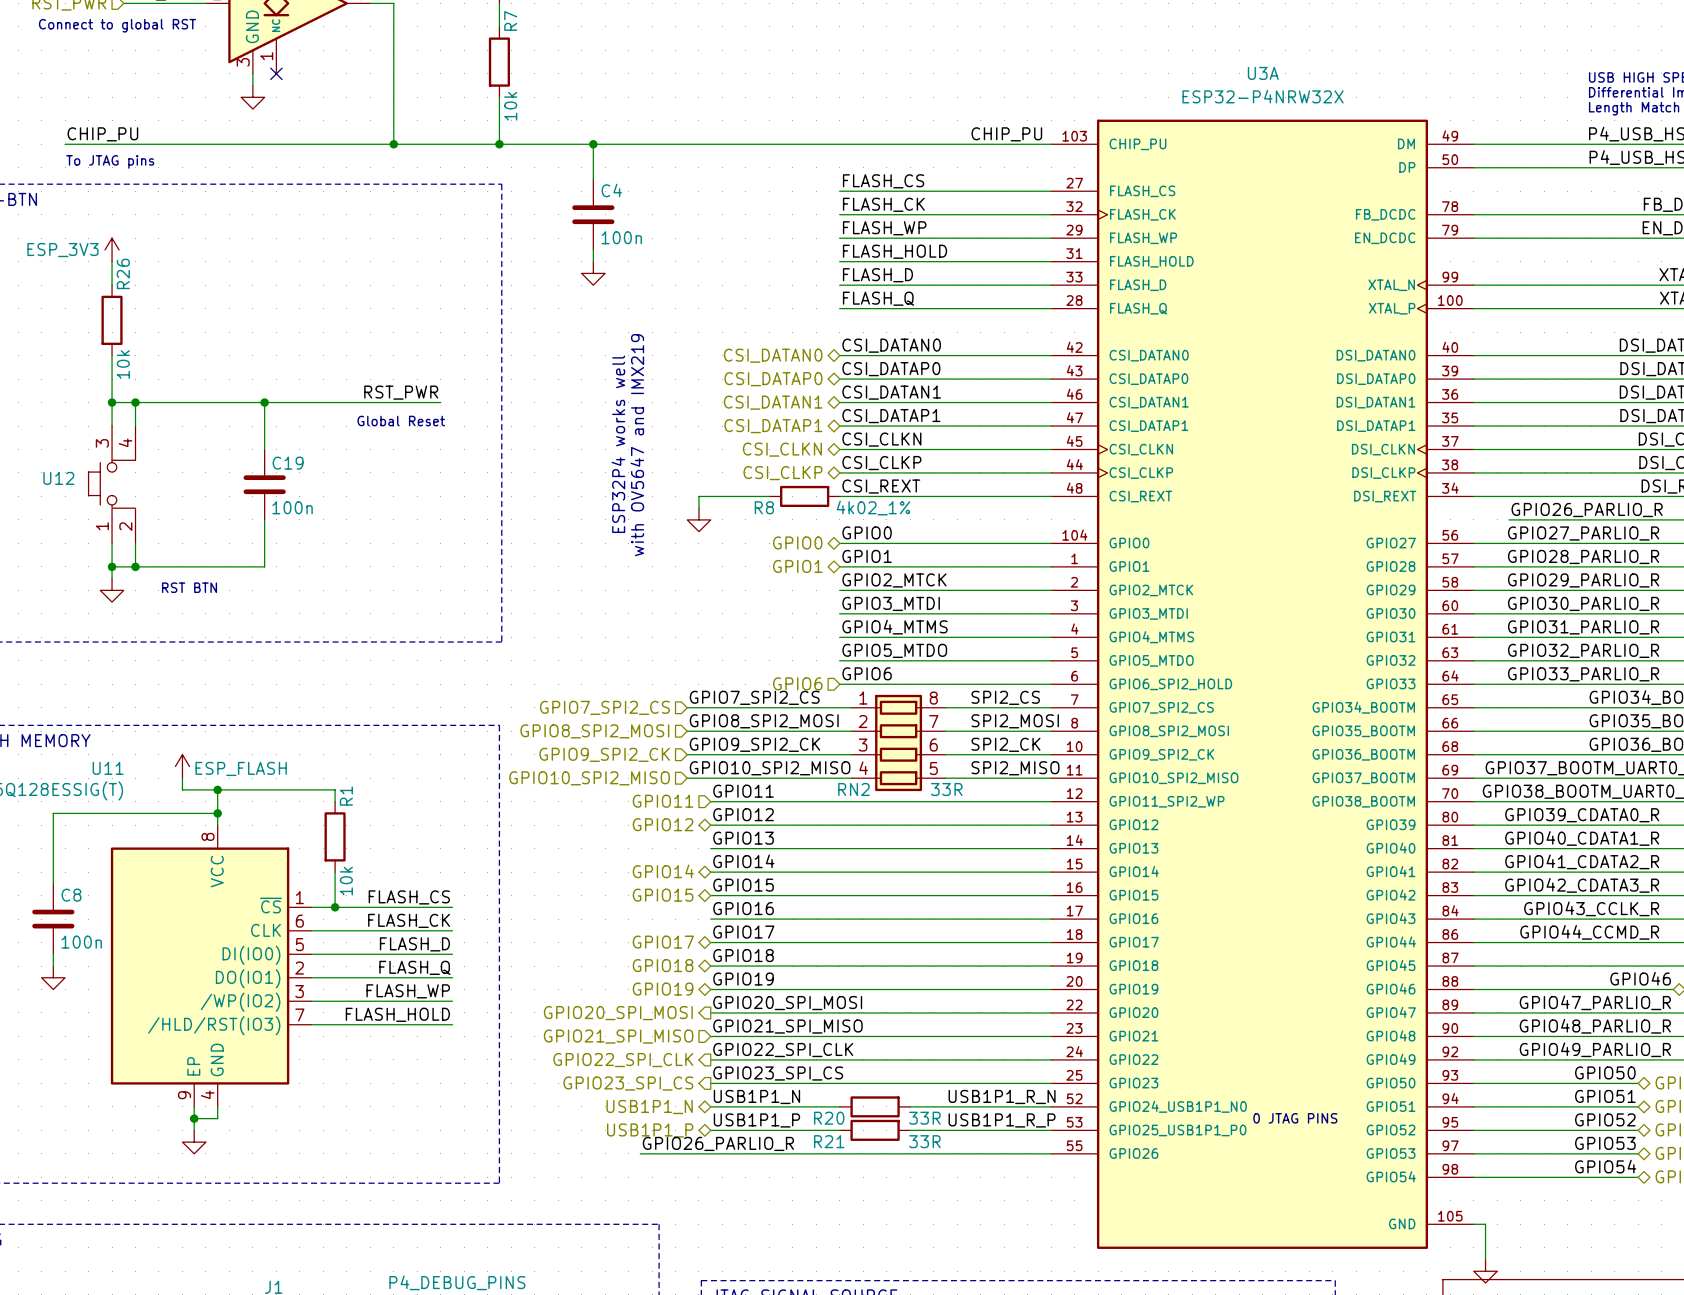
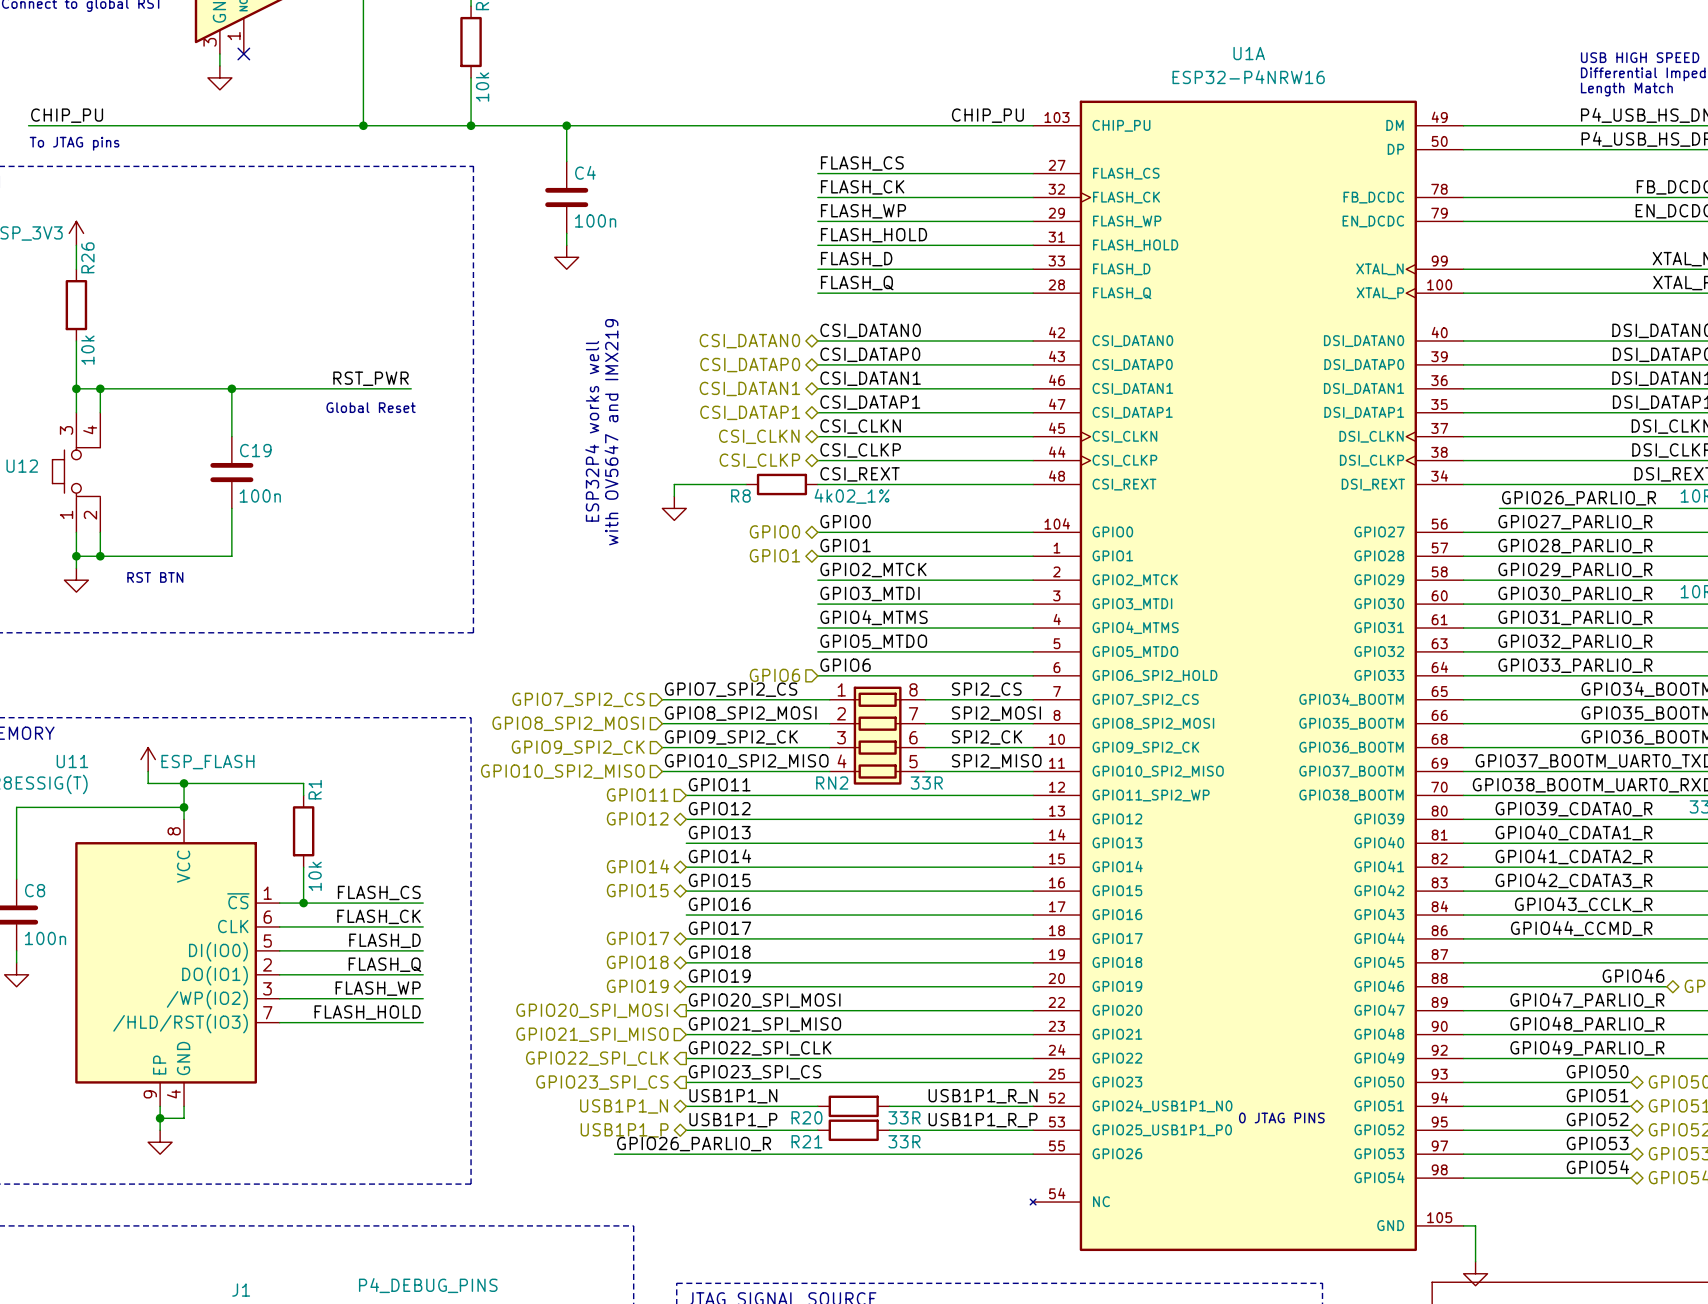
U1A: none -> ESP32-P4NRW16 (1246, 675)
U3A: ESP32-P4NRW32X (1262, 684) -> none

